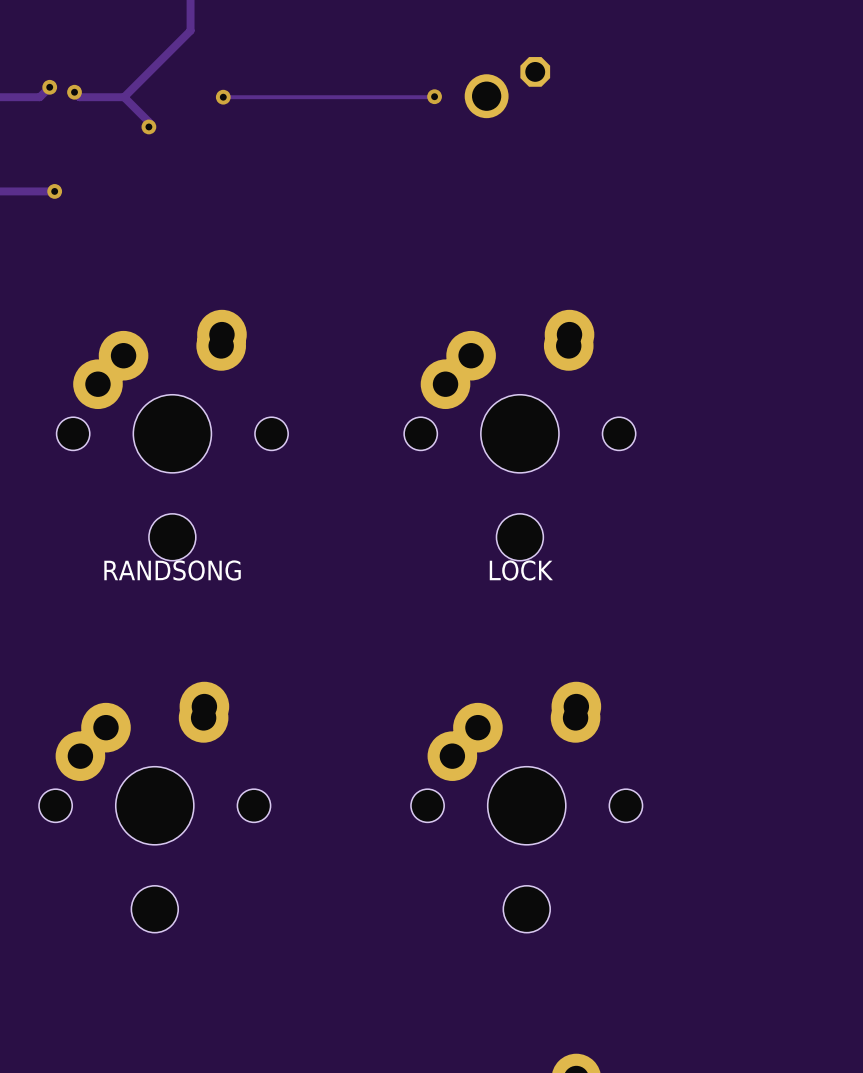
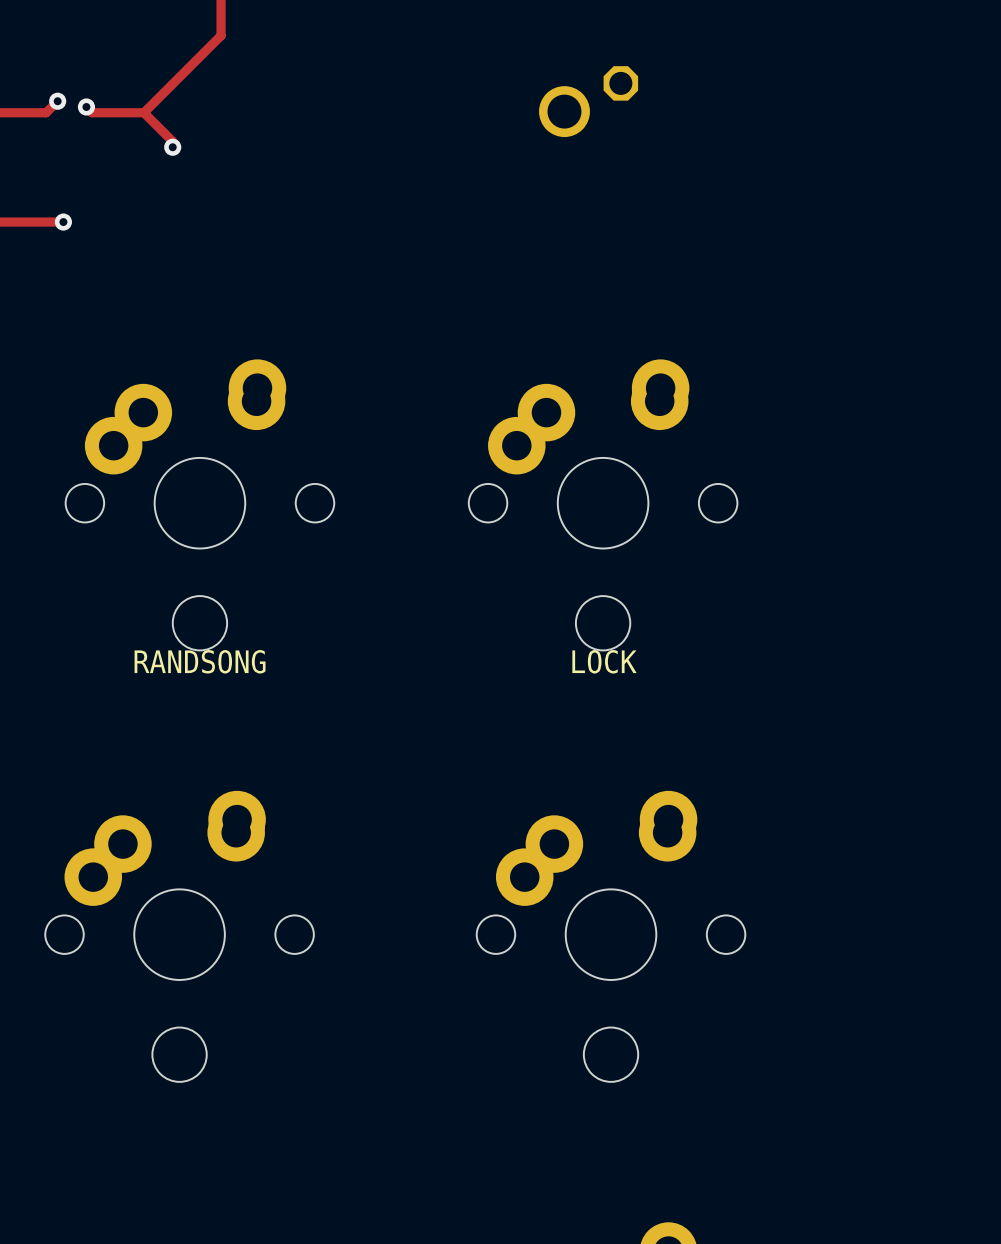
via: (434, 96) -> none
track: (223, 97) (434, 97) -> none
via: (223, 97) -> none

